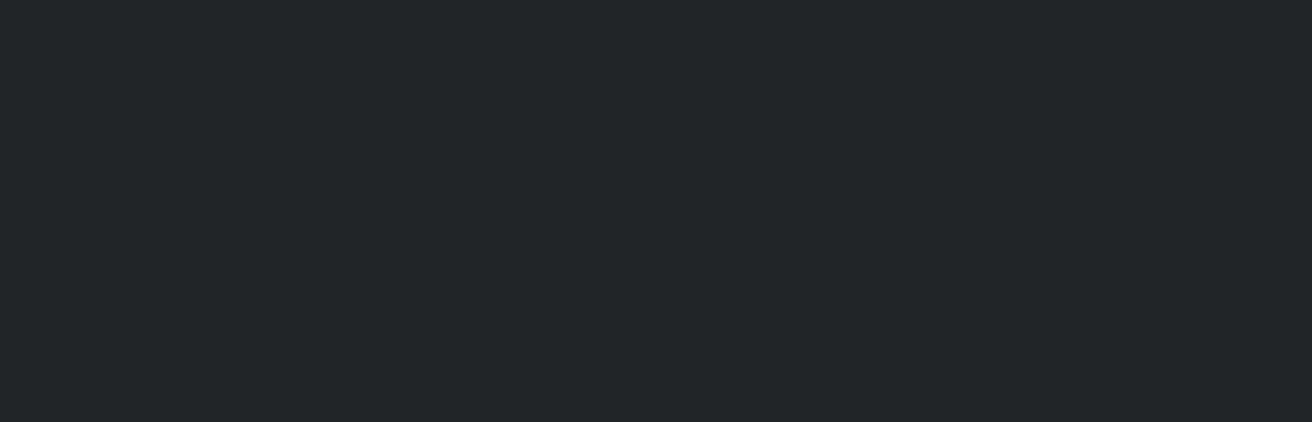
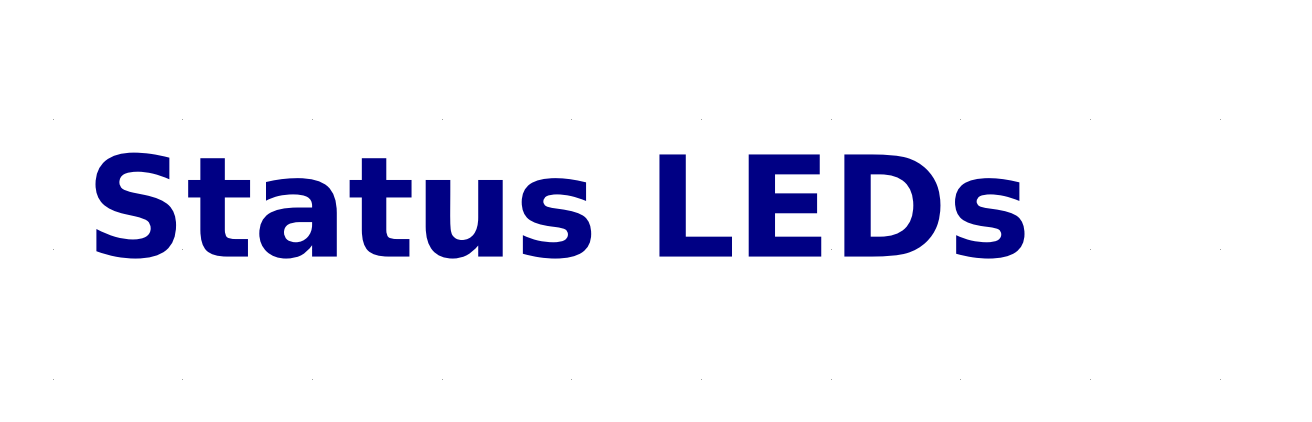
text: none -> Status LEDs (560, 205)

